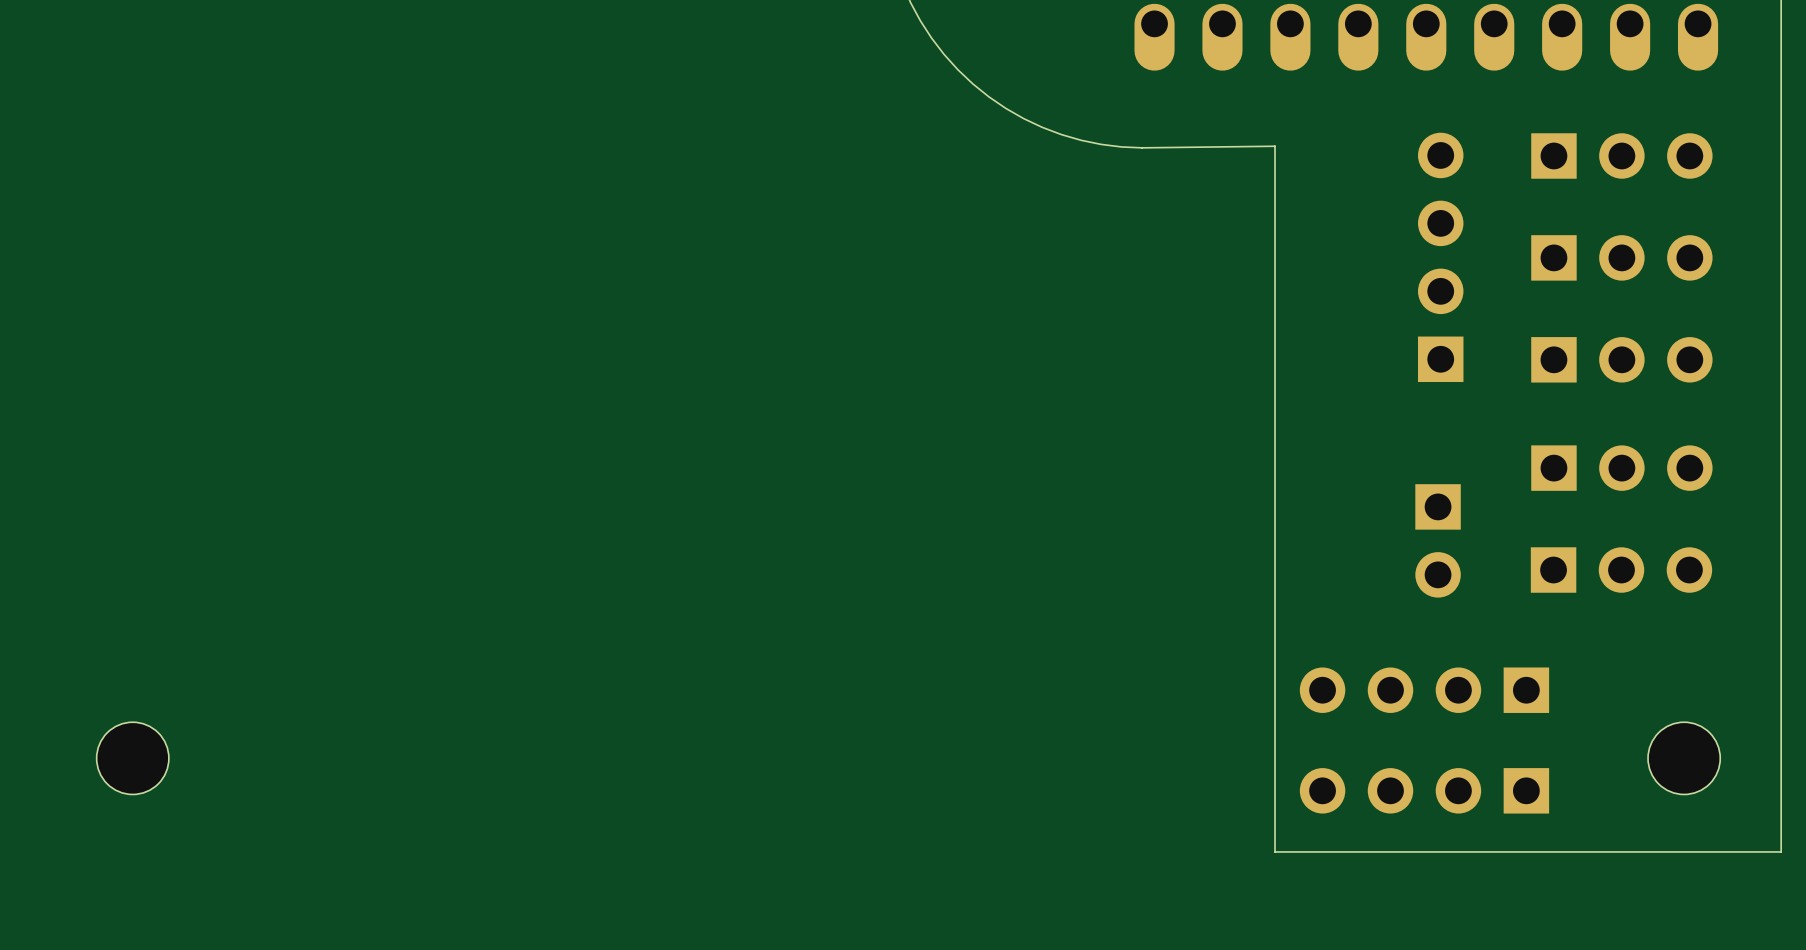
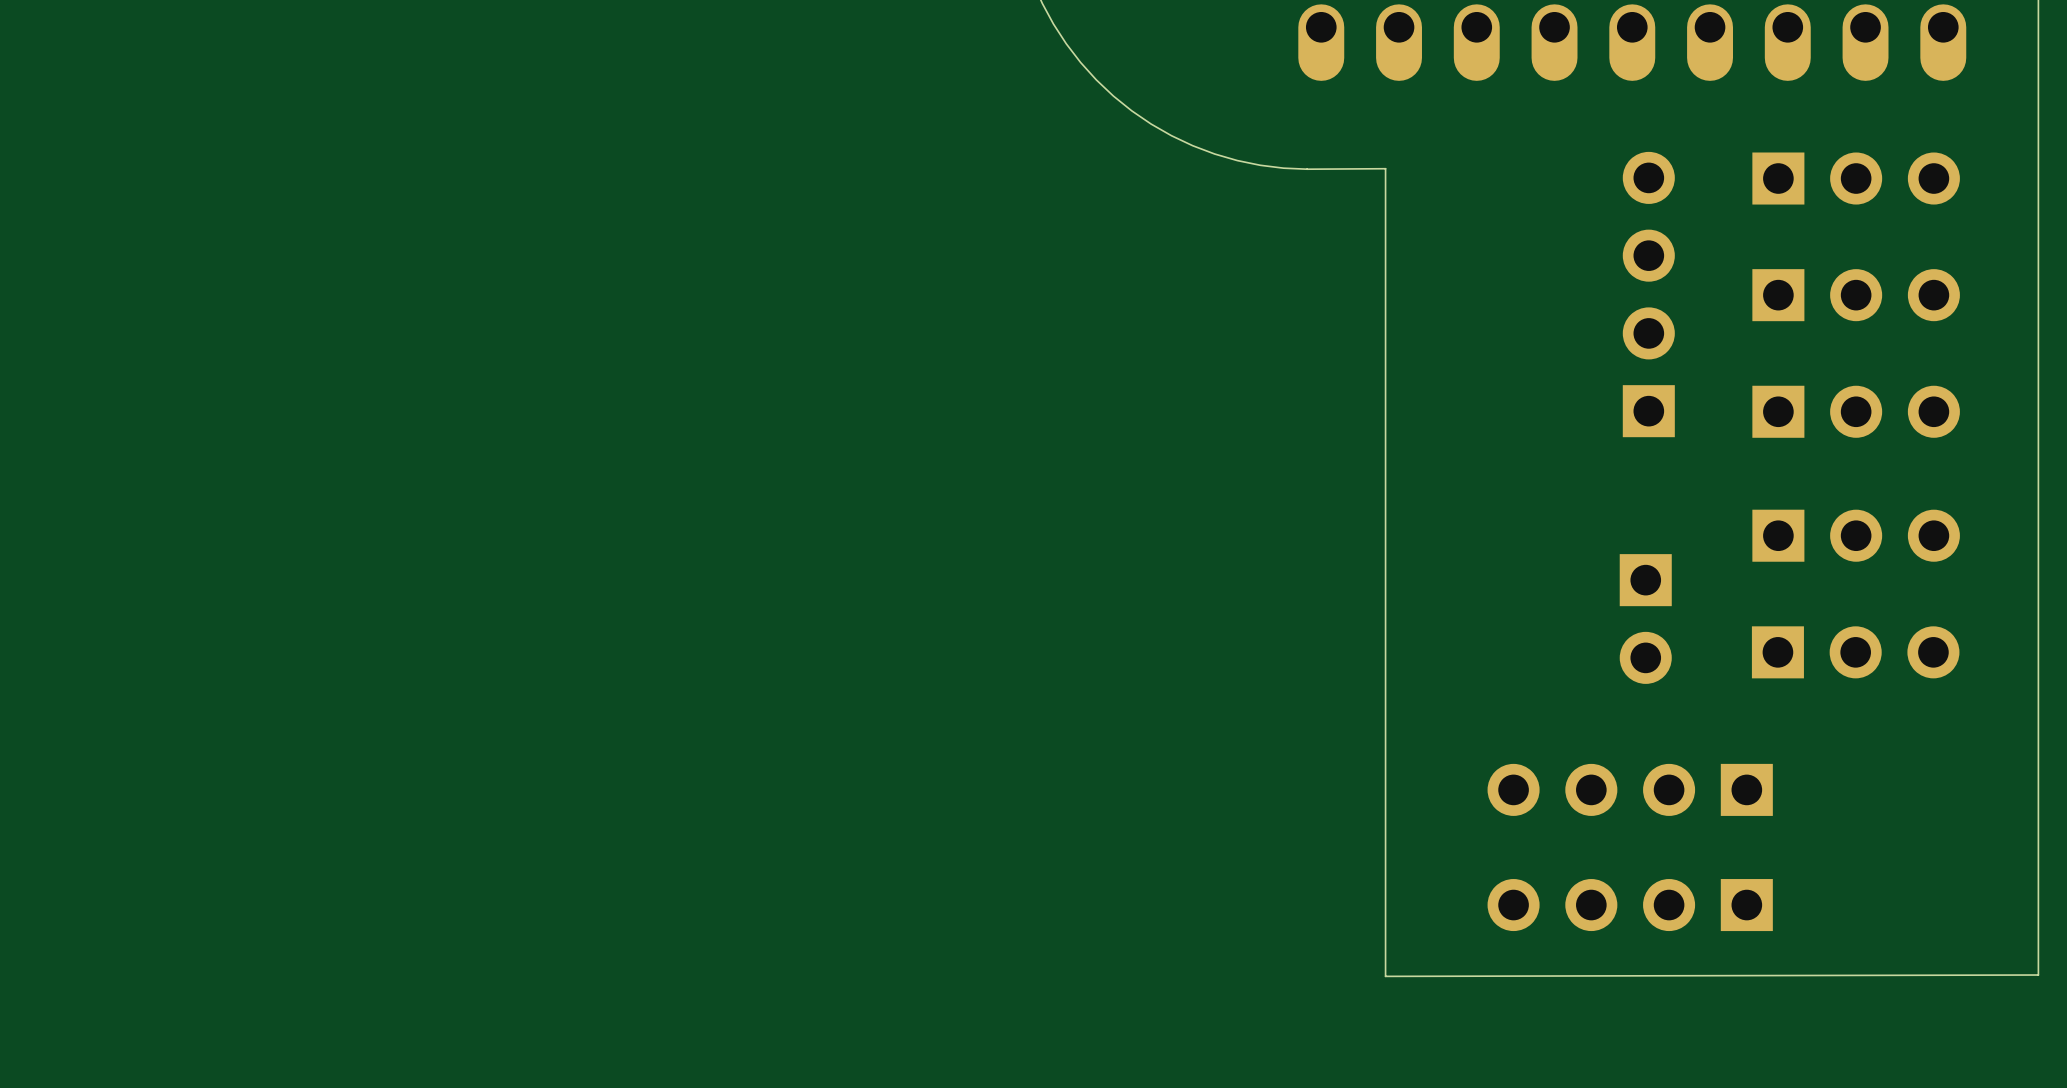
board edge: (1142, 147) (1275, 146) (1275, 851) (1781, 851) -> (1307, 169) (1385, 168) (1385, 976) (2038, 975)
part: (132, 758) -> none
part: (1684, 758) -> none

